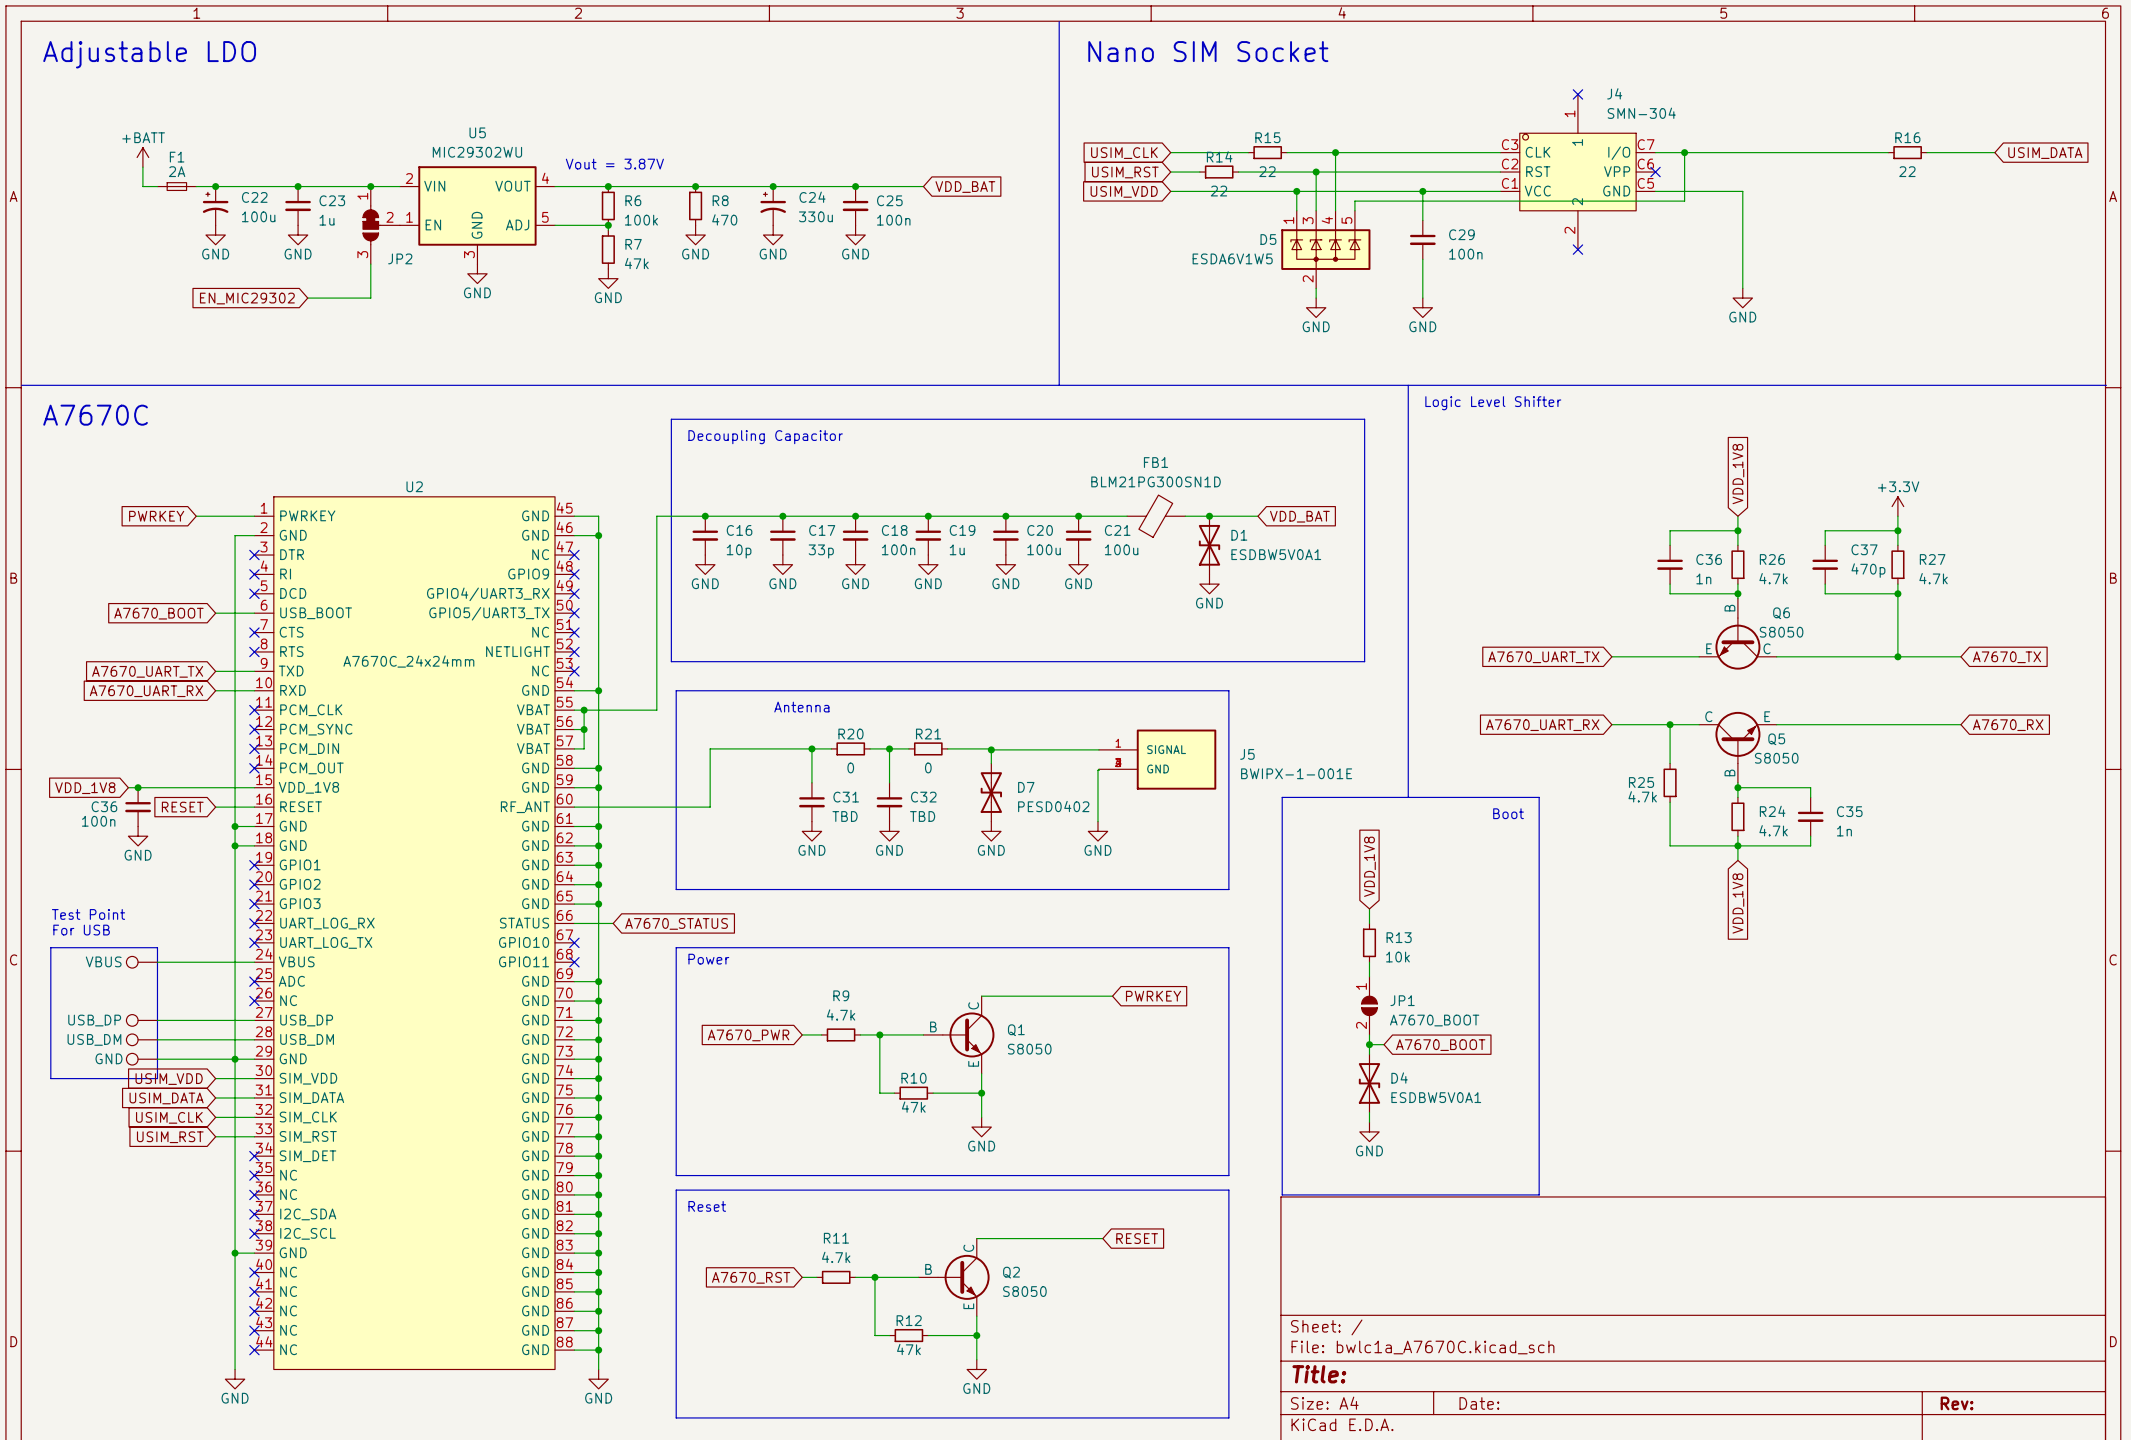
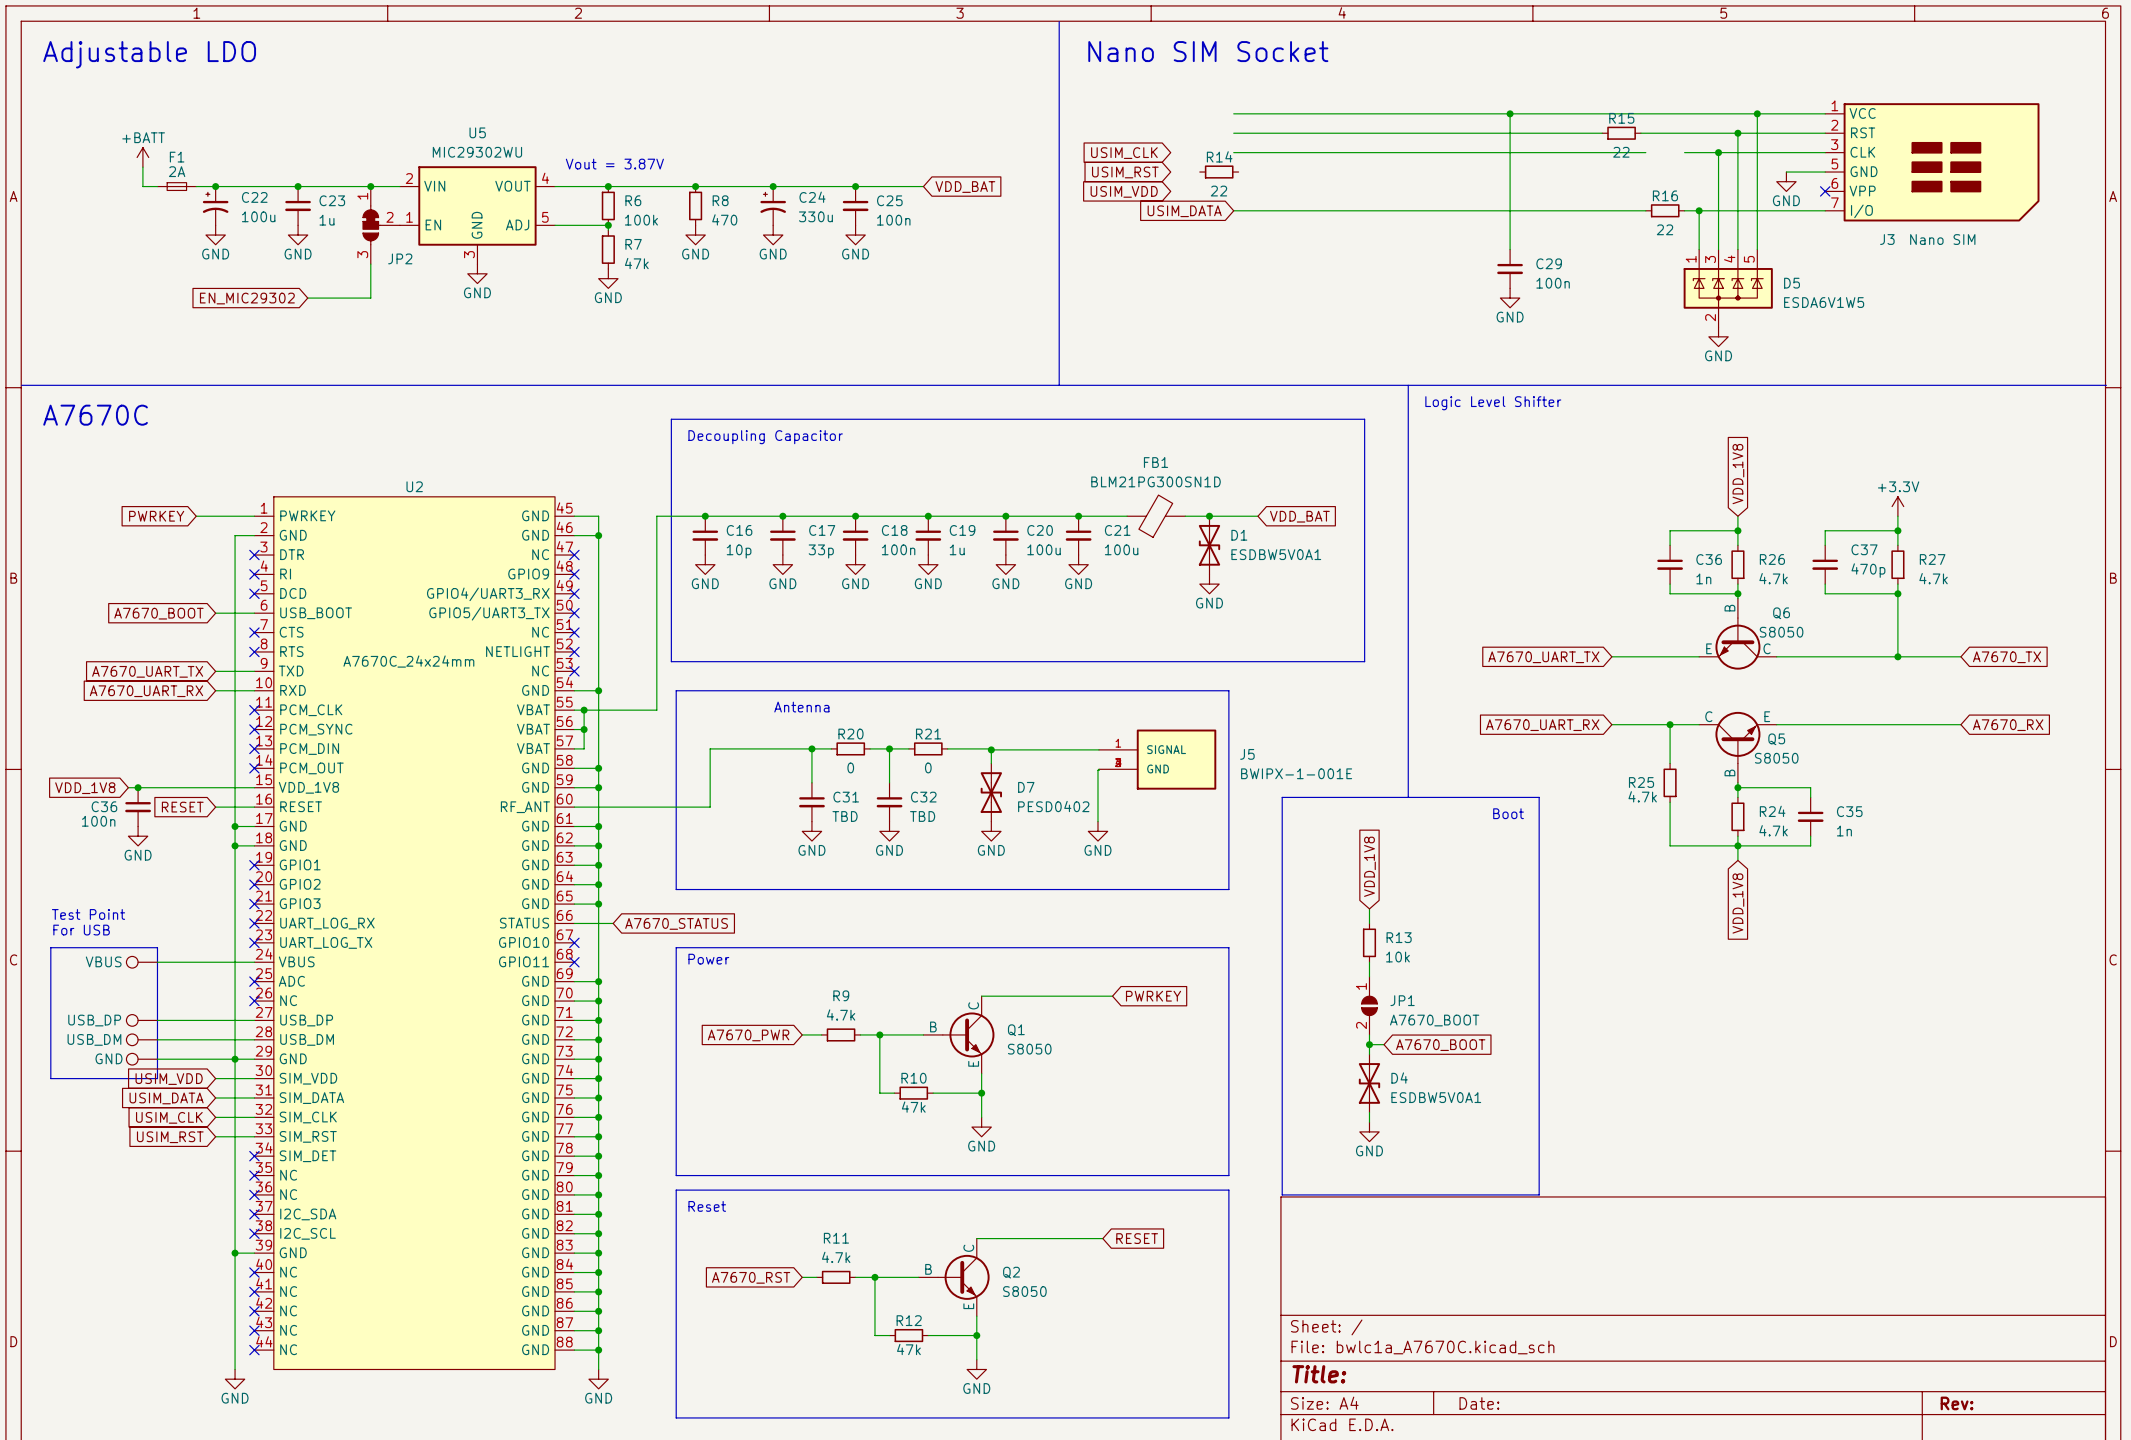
no-connect mark: (1577, 94) -> none
wire: none -> (1233, 113) (1825, 113)
wire: none -> (1510, 113) (1510, 249)
junction: none -> (1510, 113)
wire: none -> (1757, 113) (1757, 249)
junction: none -> (1757, 113)
wire: none -> (1233, 133) (1602, 133)
wire: none -> (1640, 133) (1825, 133)
wire: none -> (1737, 133) (1737, 249)
junction: none -> (1737, 133)
wire: (1170, 152) (1233, 152) -> none
wire: none -> (1248, 152) (1287, 152)
R15 position: (1267, 152) -> (1621, 133)
wire: (1335, 152) (1335, 210) -> none
junction: (1335, 152) -> none
wire: (1655, 152) (1684, 152) (1684, 201) (1354, 201) (1354, 210) -> none
junction: (1684, 152) -> none
wire: none -> (1718, 152) (1718, 249)
junction: none -> (1718, 152)
R16 position: (1907, 152) -> (1665, 210)
global label: USIM_DATA (2045, 153) -> none
J3: none -> Nano SIM (1932, 162)
wire: (1170, 172) (1199, 172) -> none
wire: (1238, 172) (1500, 172) -> none
wire: (1316, 172) (1316, 210) -> none
junction: (1316, 172) -> none
J4: SMN-304 (1577, 172) -> none
no-connect mark: (1655, 172) -> none
wire: none -> (1786, 172) (1825, 172)
power symbol: none -> GND (1786, 181)
wire: (1170, 191) (1500, 191) -> none
wire: (1296, 191) (1296, 210) -> none
junction: (1296, 191) -> none
wire: (1422, 191) (1422, 220) -> none
junction: (1422, 191) -> none
wire: (1655, 191) (1742, 191) (1742, 288) -> none
no-connect mark: none -> (1825, 191)
wire: none -> (1233, 210) (1645, 210)
wire: none -> (1684, 210) (1825, 210)
wire: none -> (1699, 210) (1699, 249)
junction: none -> (1699, 210)
global label: none -> USIM_DATA (1184, 211)
D5 name position: D5 (1268, 239) -> D5 (1792, 283)
C29 position: (1422, 239) -> (1510, 268)
D5 position: (1325, 249) -> (1728, 288)
no-connect mark: (1577, 249) -> none
D5 value position: ESDA6V1W5 (1232, 258) -> ESDA6V1W5 (1824, 302)
wire: (1422, 259) (1422, 298) -> none
wire: (1316, 288) (1316, 298) -> none
power symbol position: GND (1742, 298) -> GND (1718, 336)
power symbol: GND (1316, 307) -> none
power symbol position: GND (1422, 307) -> GND (1510, 298)

